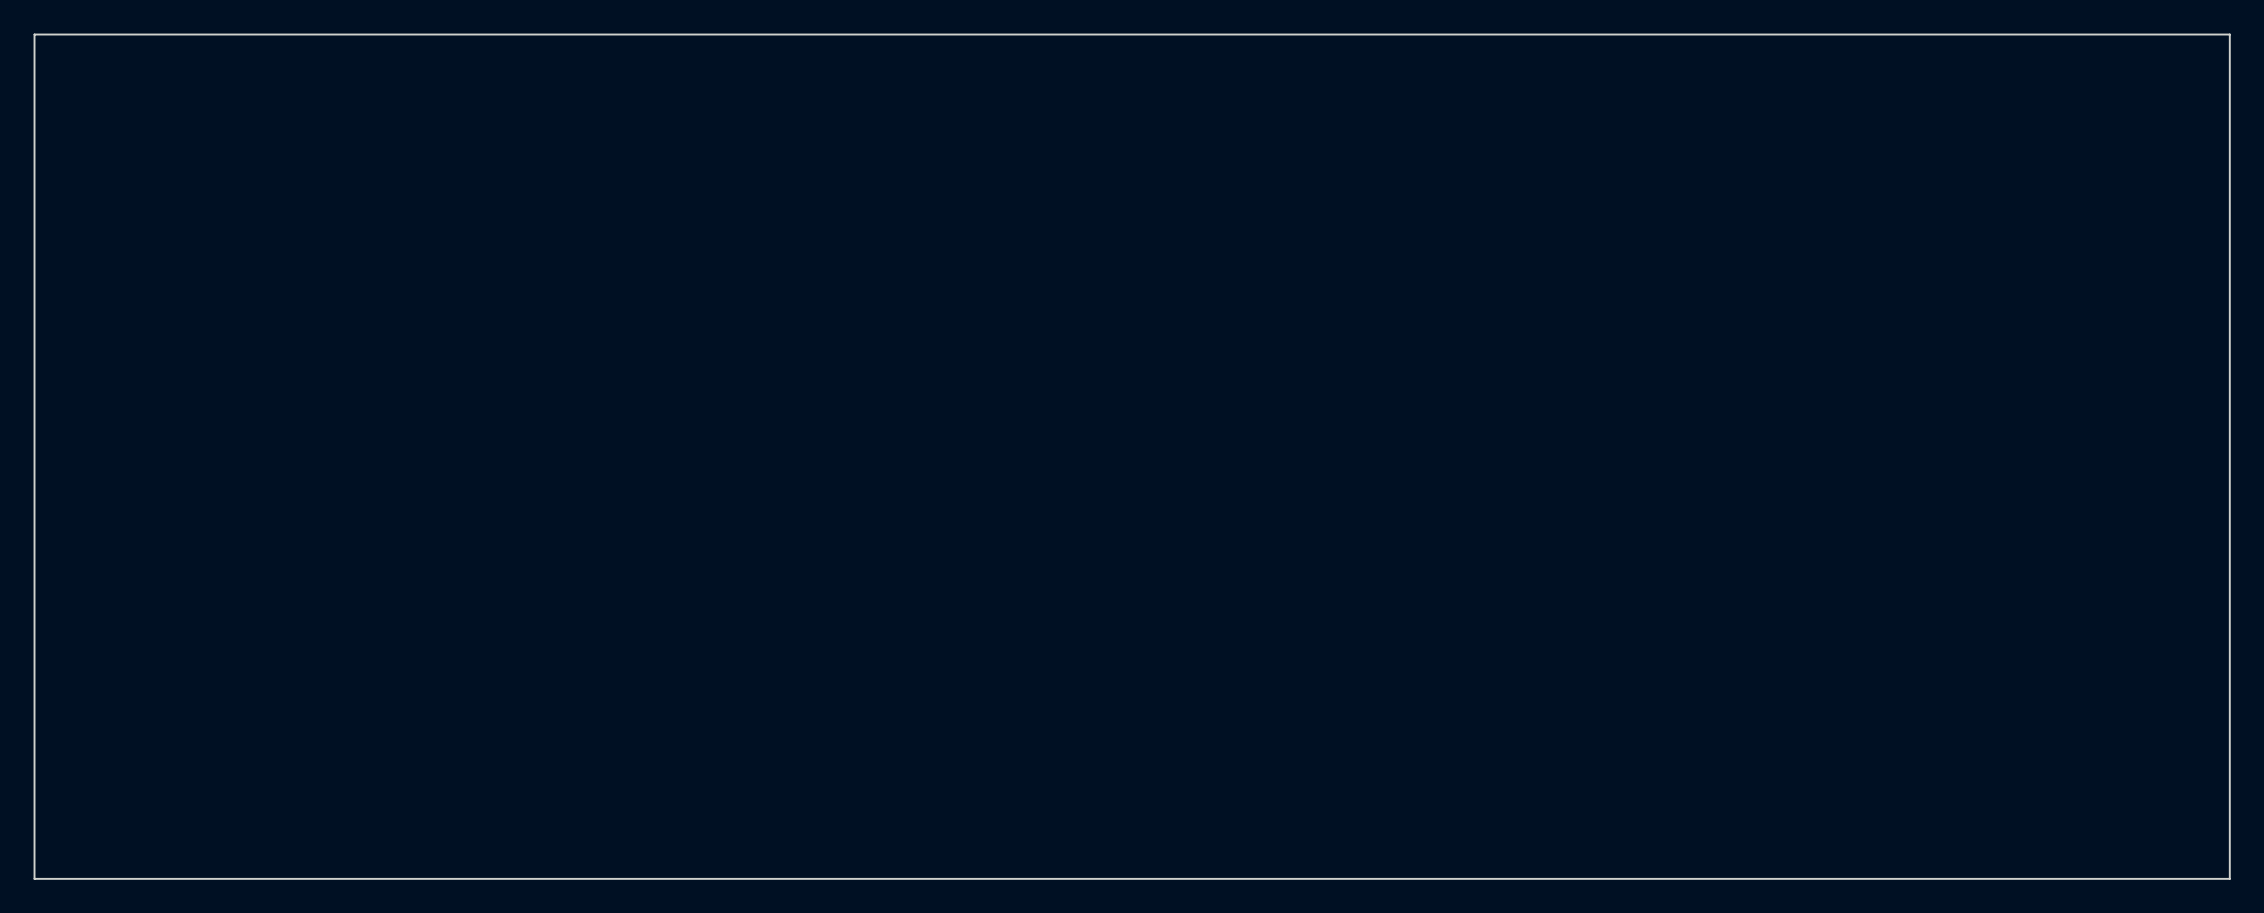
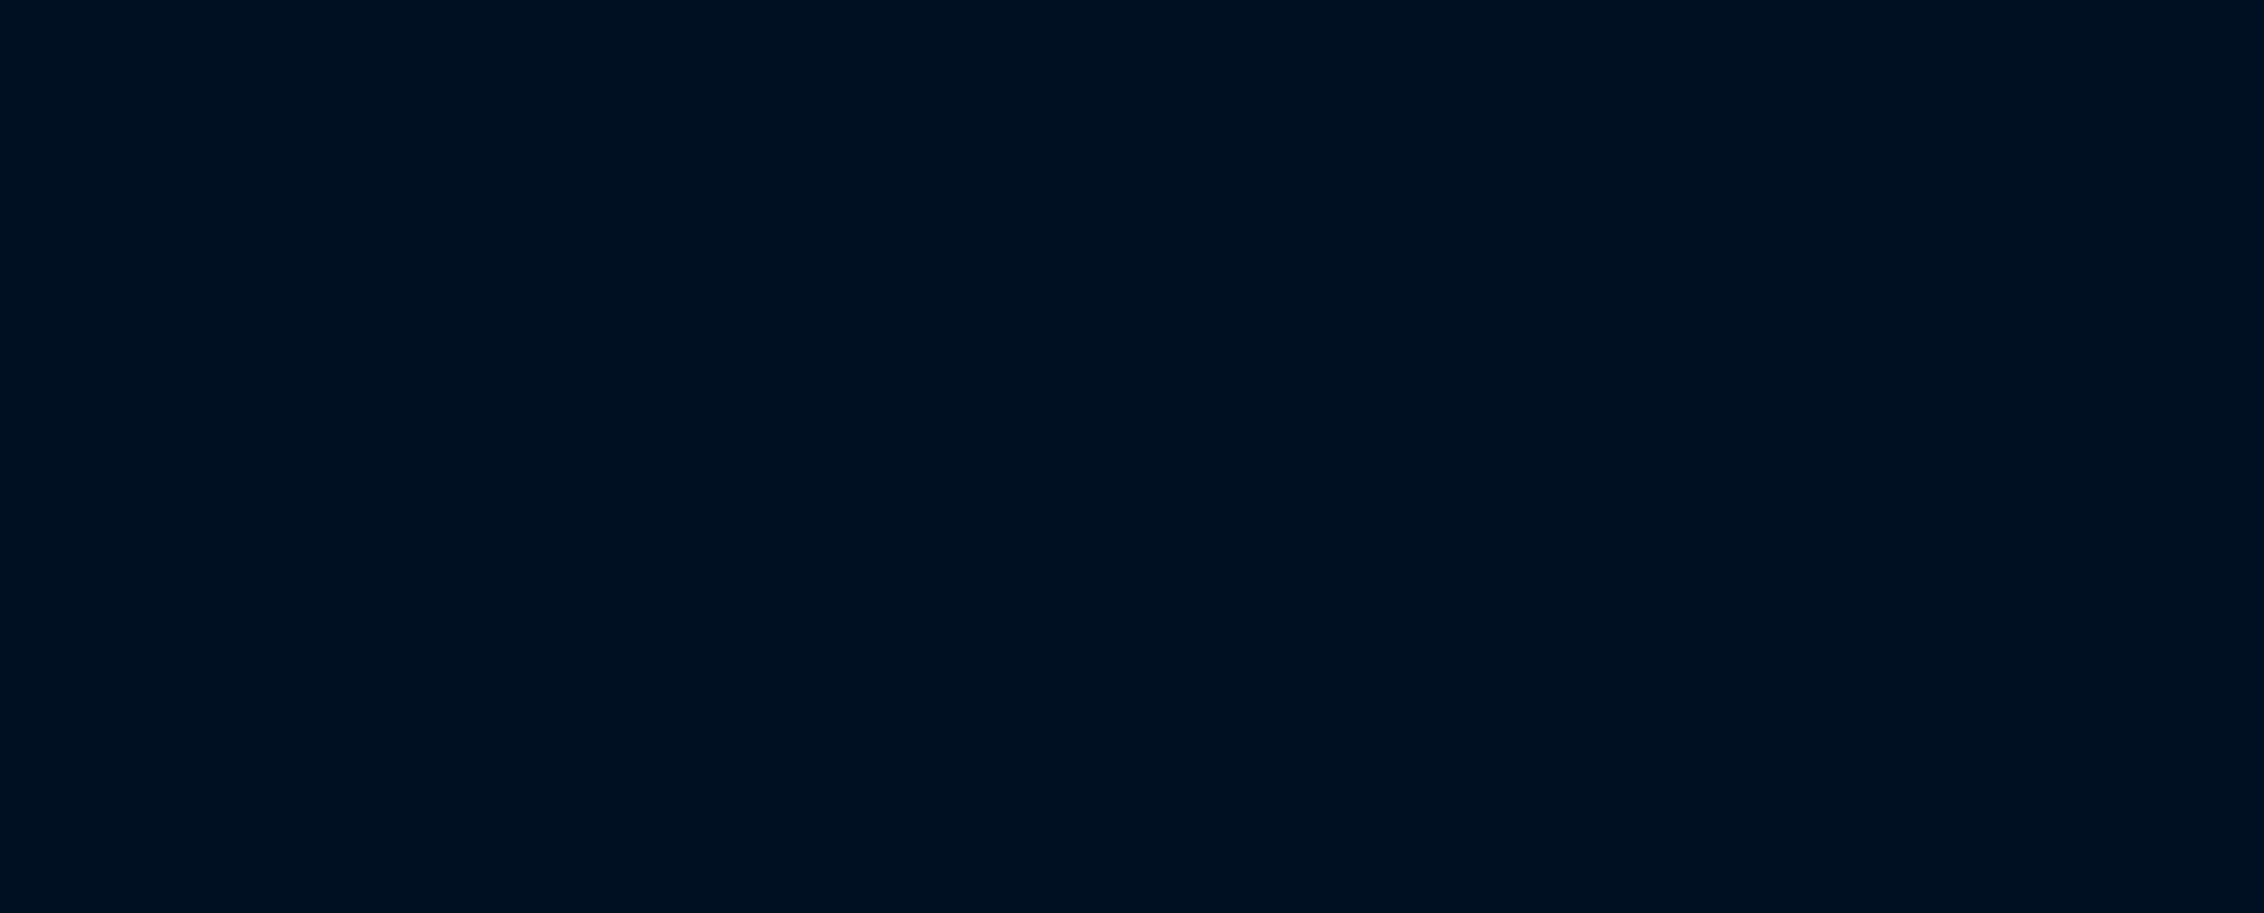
board edge: (34, 34) (34, 878) (2229, 878) (2229, 34) (34, 34) -> none

